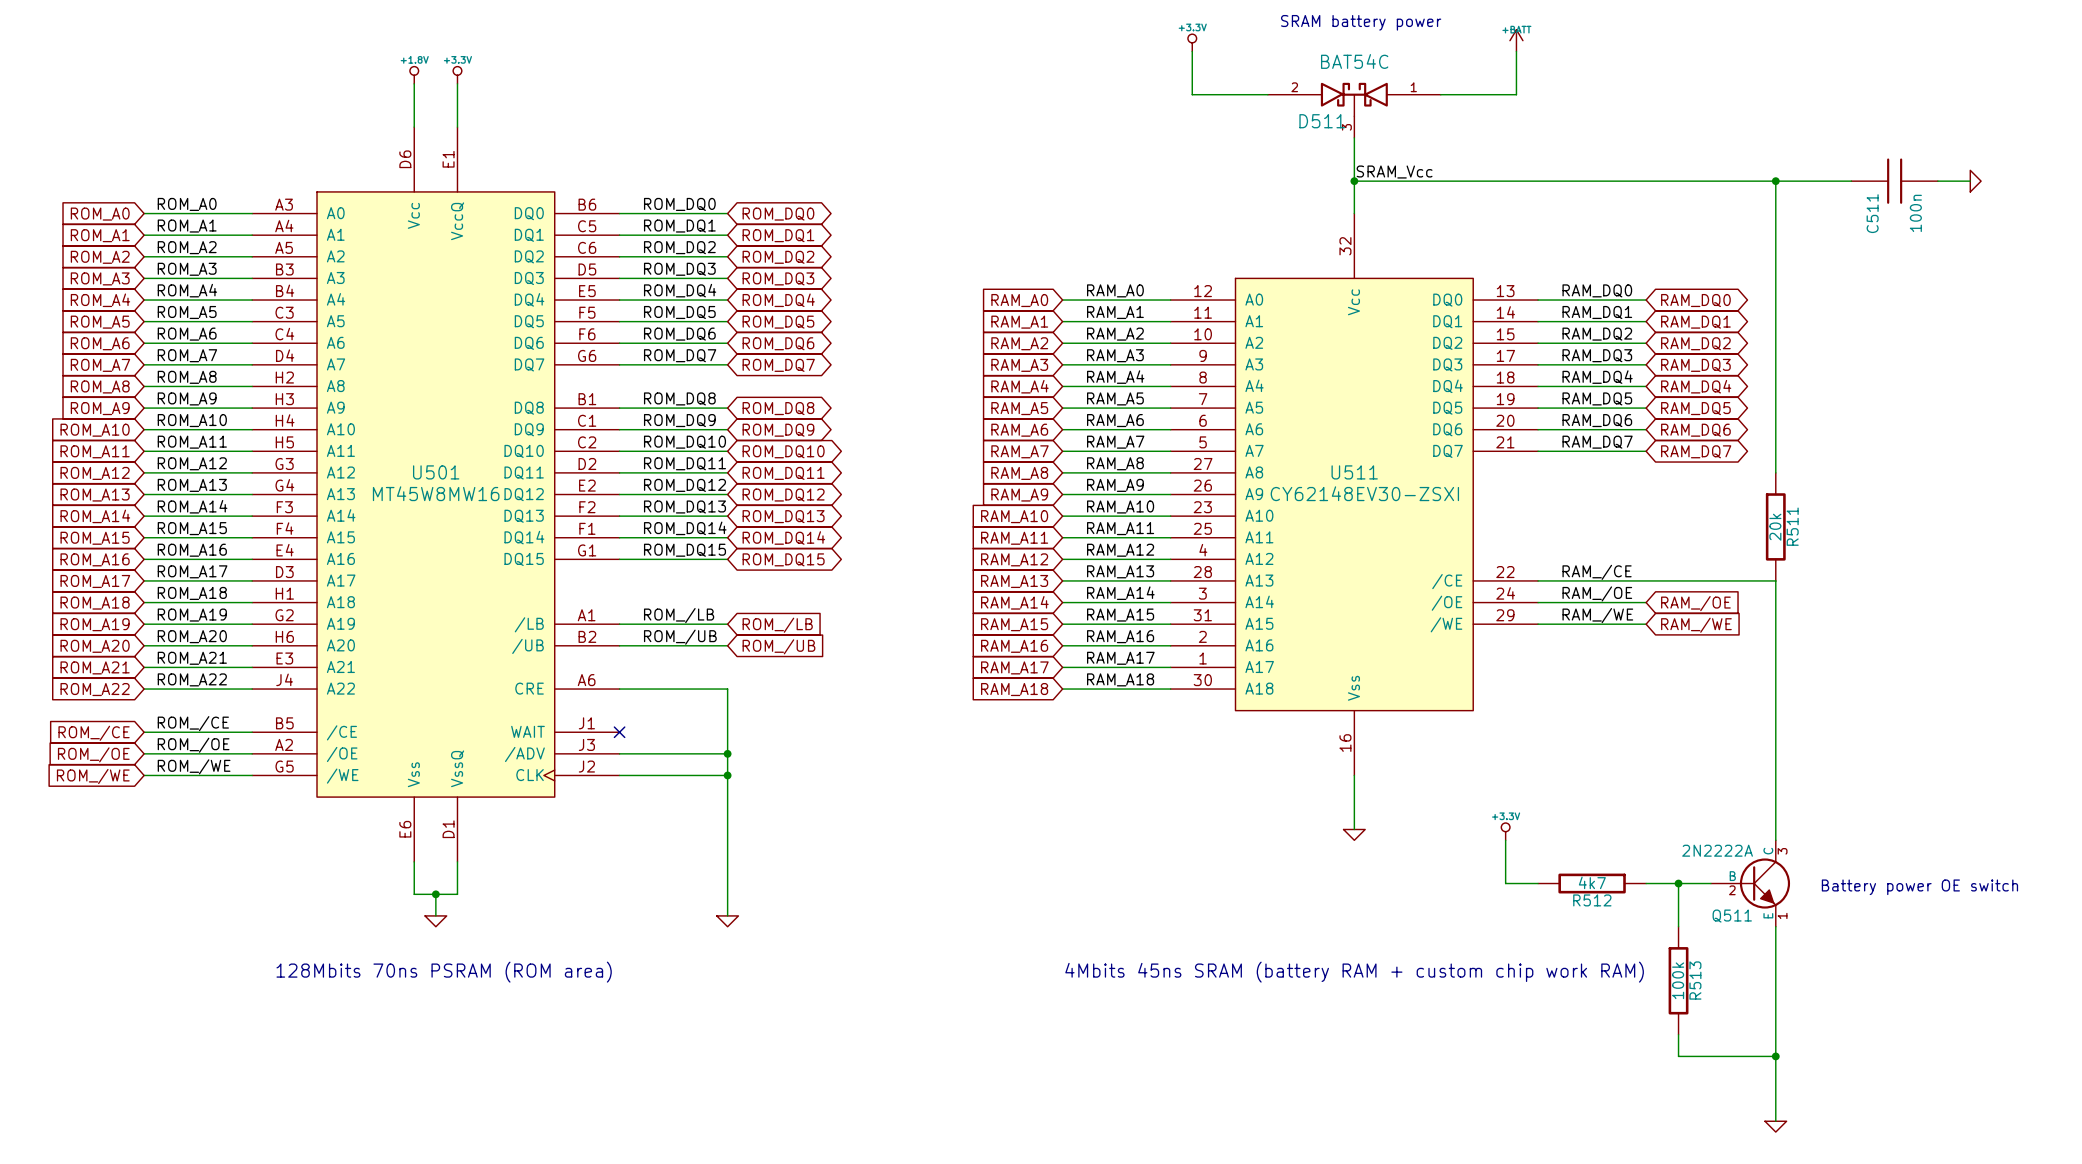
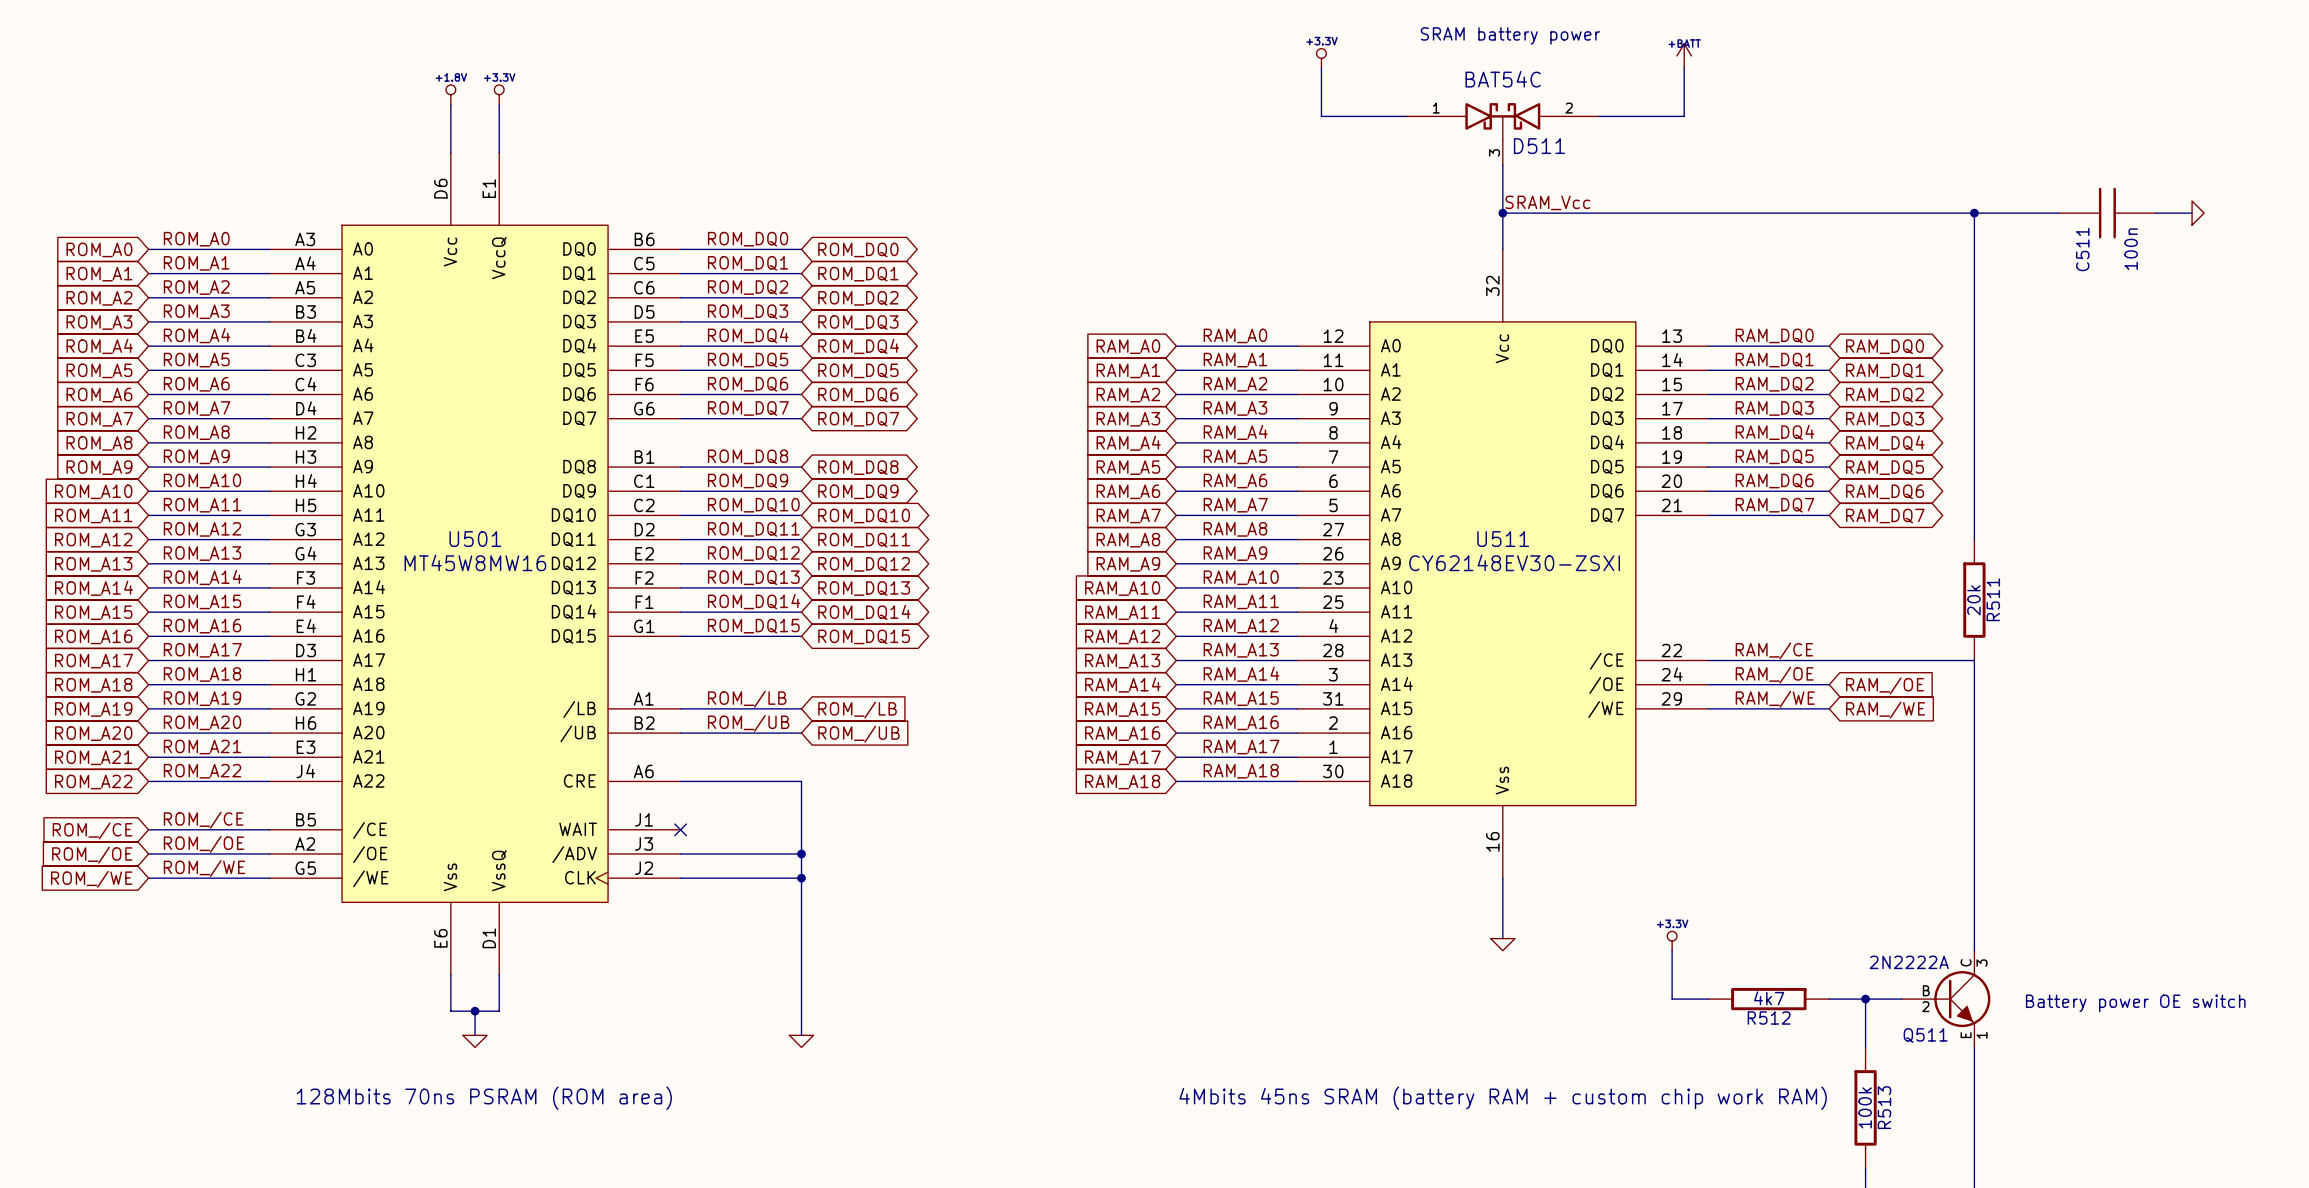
D511 flip: as is (1354, 99) -> left-right (1502, 121)

